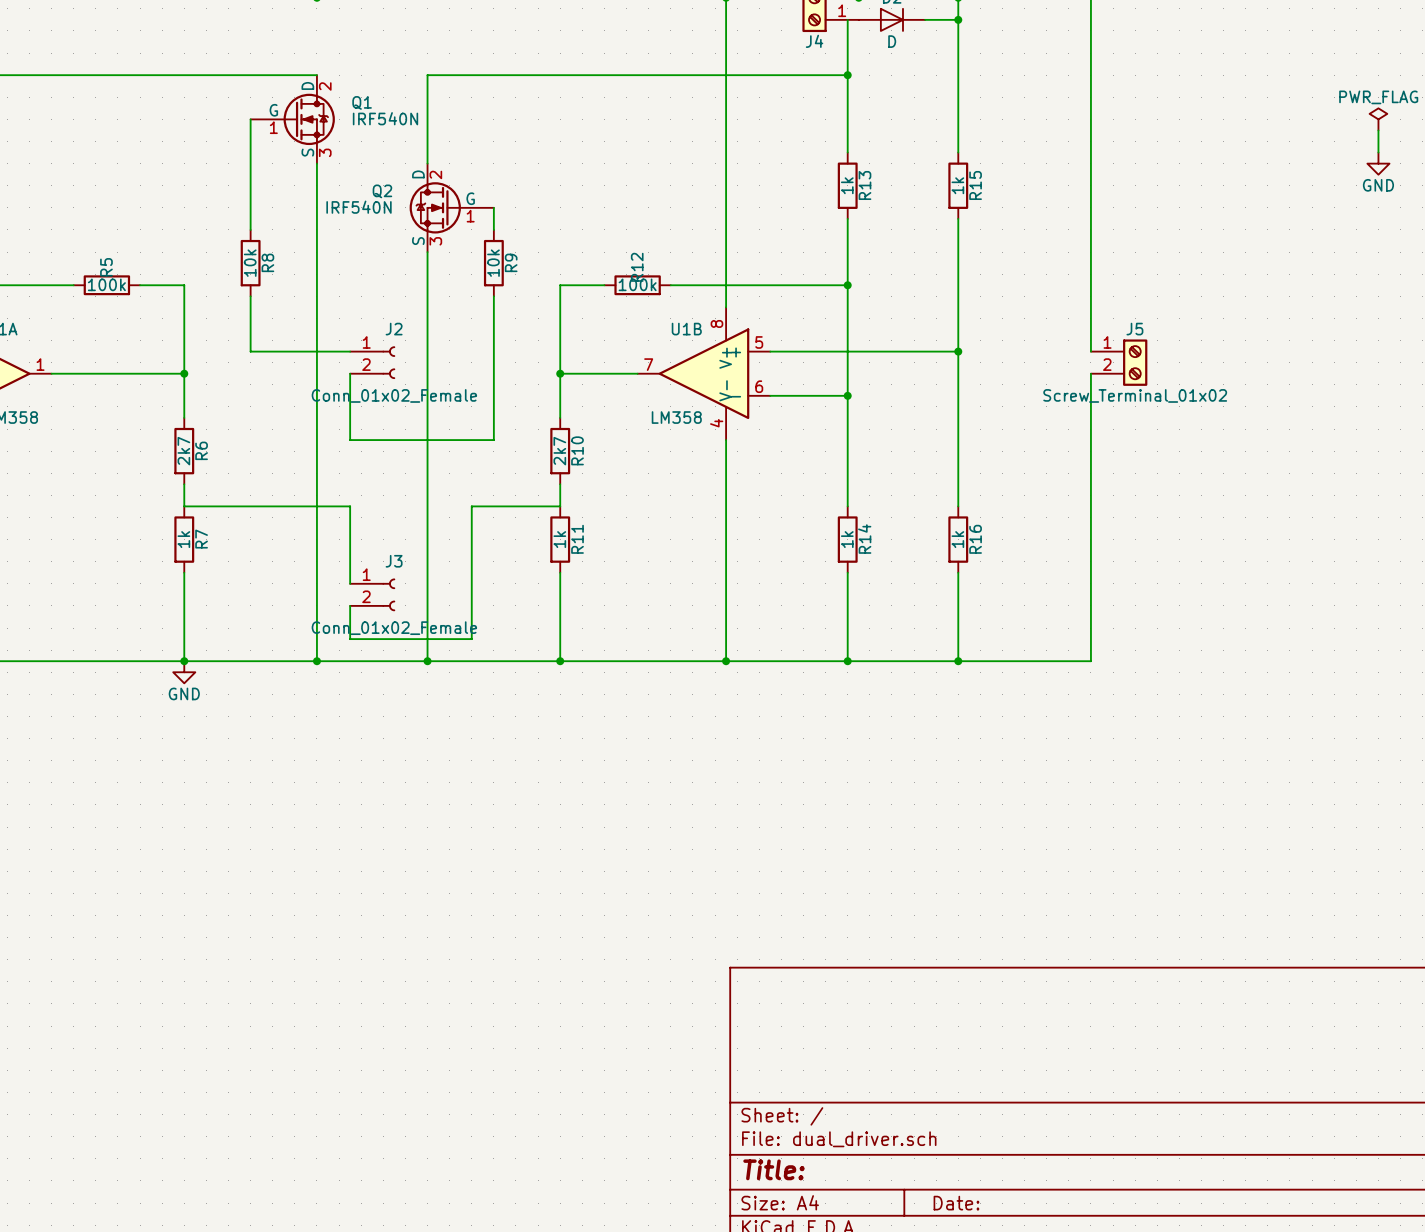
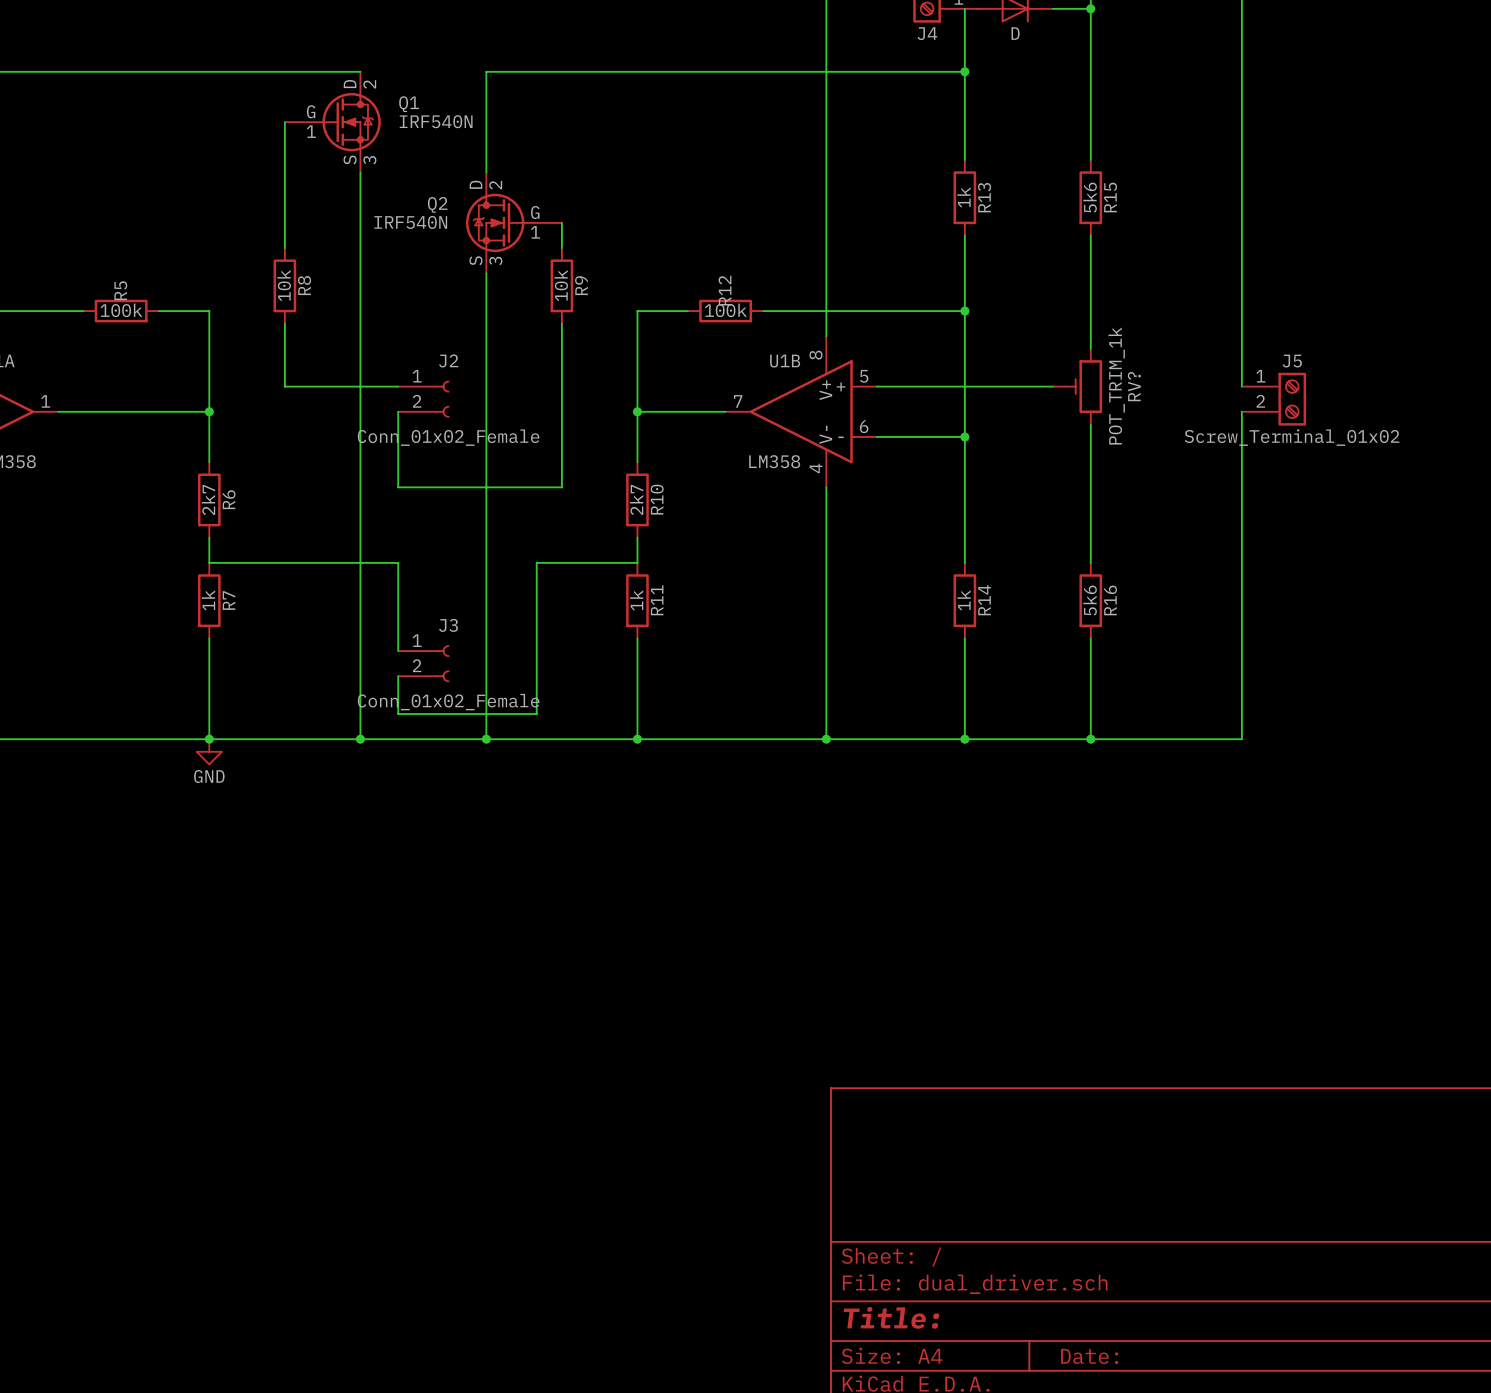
R15 value: 1k (957, 185) -> 5k6 (1090, 197)
wire: (958, 318) (958, 384) -> none
RV?: none -> POT_TRIM_1k (1077, 386)
junction: (958, 351) -> none
R16 value: 1k (957, 539) -> 5k6 (1090, 600)

